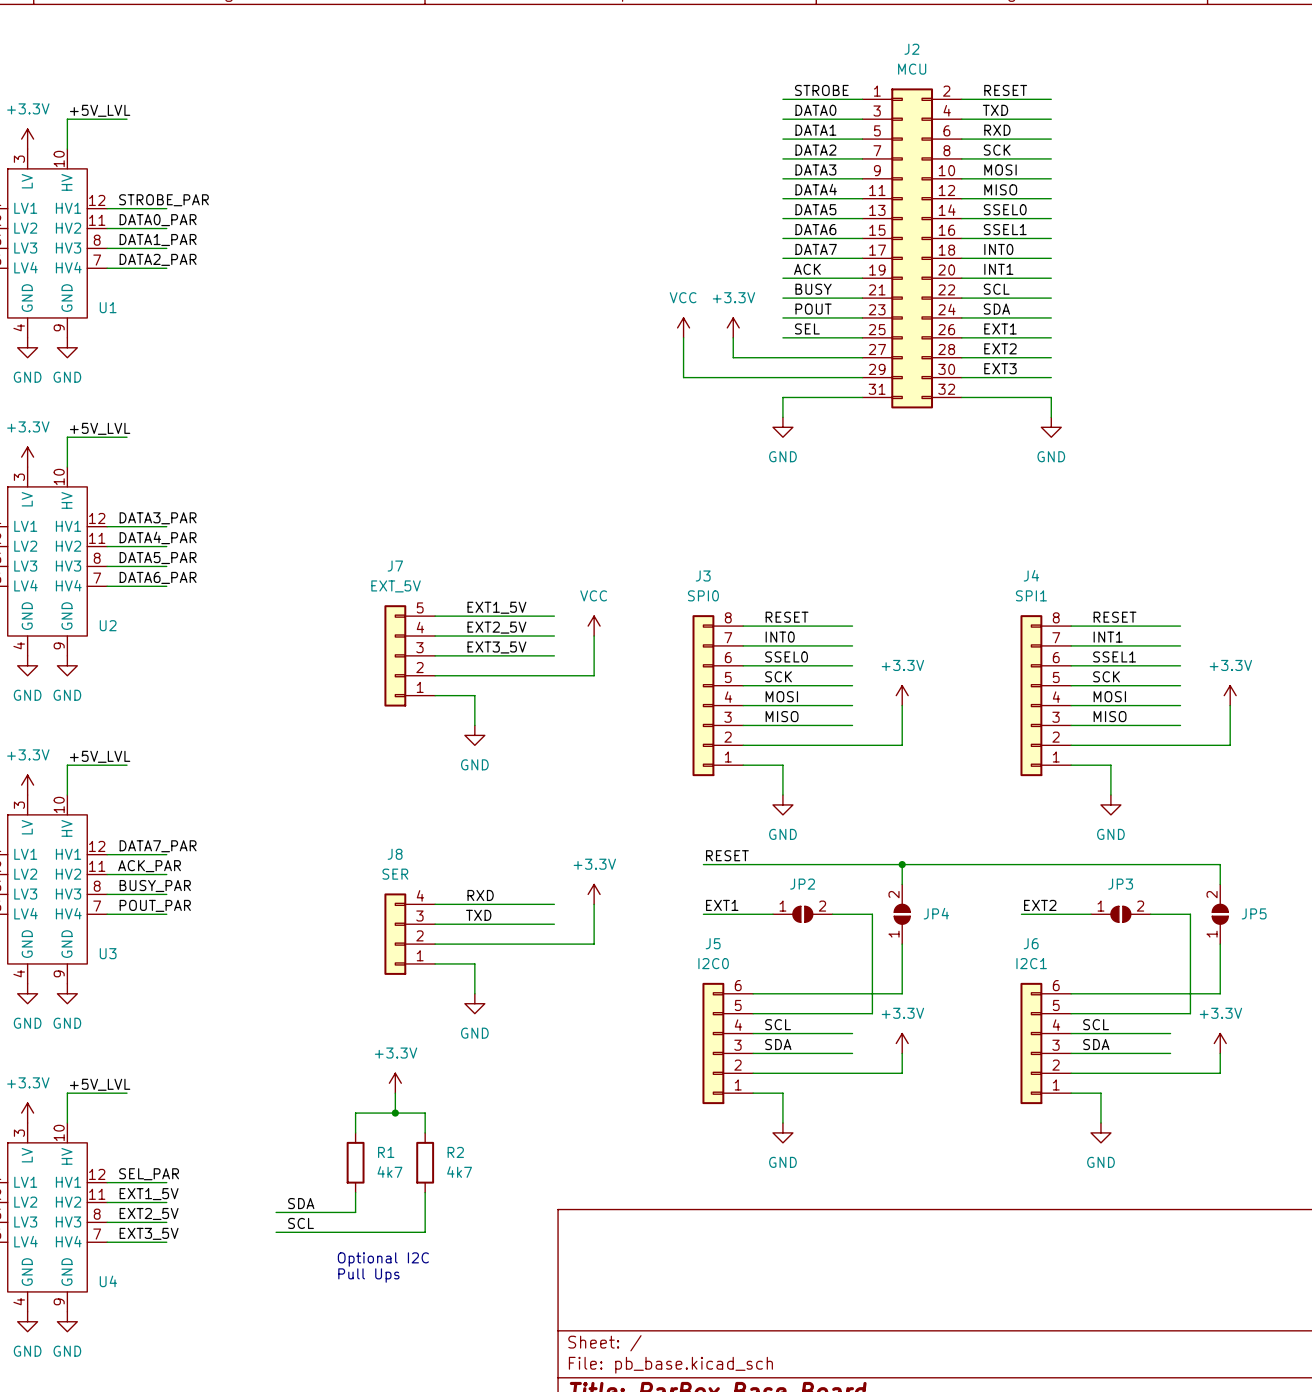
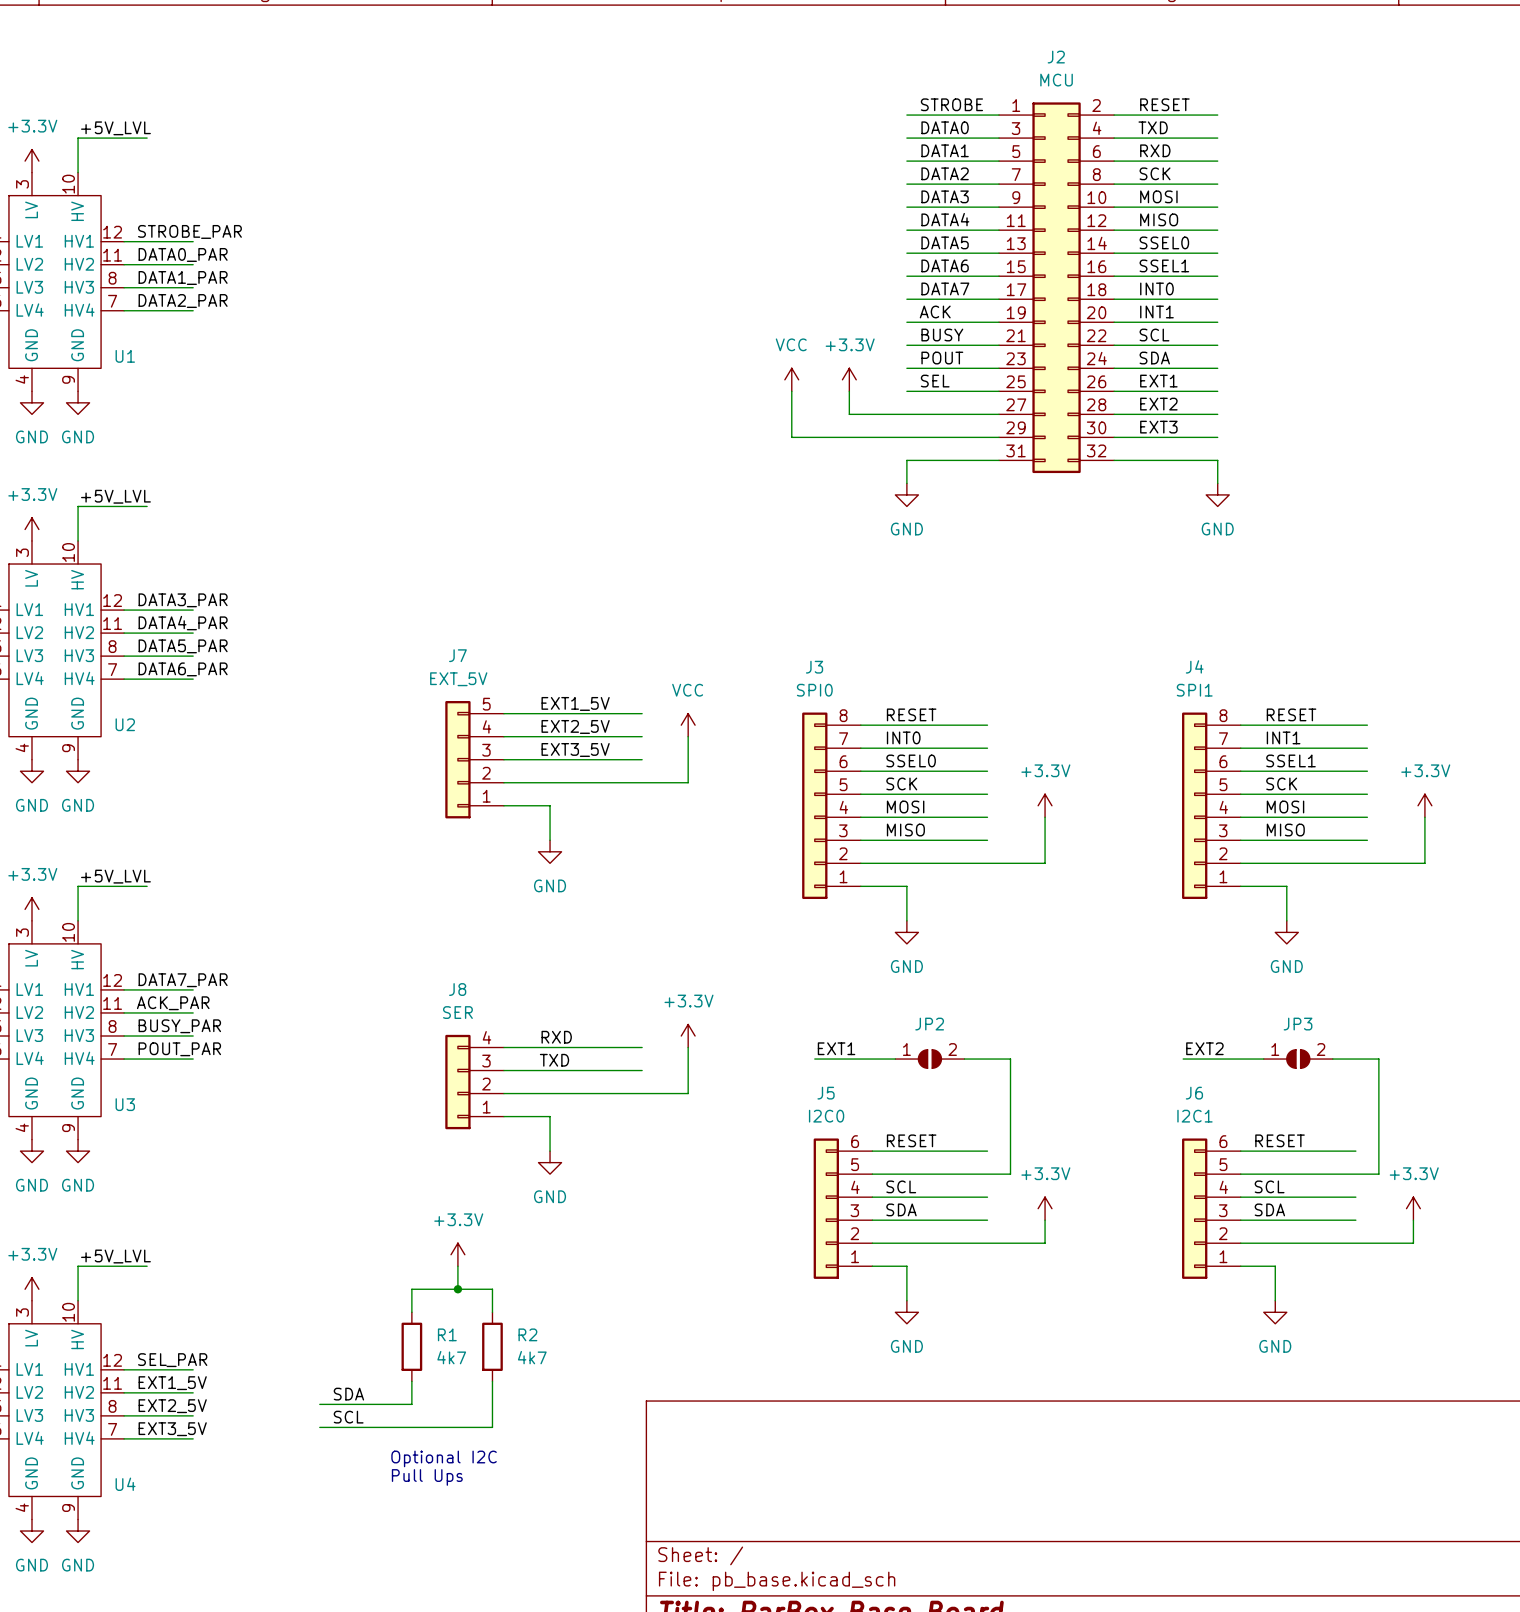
label position: RESET (727, 855) -> RESET (911, 1140)
wire: (703, 864) (1220, 864) (1220, 884) -> none
wire: (902, 864) (902, 884) -> none
junction: (902, 864) -> none
JP4: (902, 914) -> none
JP5: (1220, 914) -> none
wire: (902, 944) (902, 993) (852, 993) -> none
wire: (1220, 944) (1220, 993) (1170, 993) -> none
label: none -> RESET (1280, 1140)

